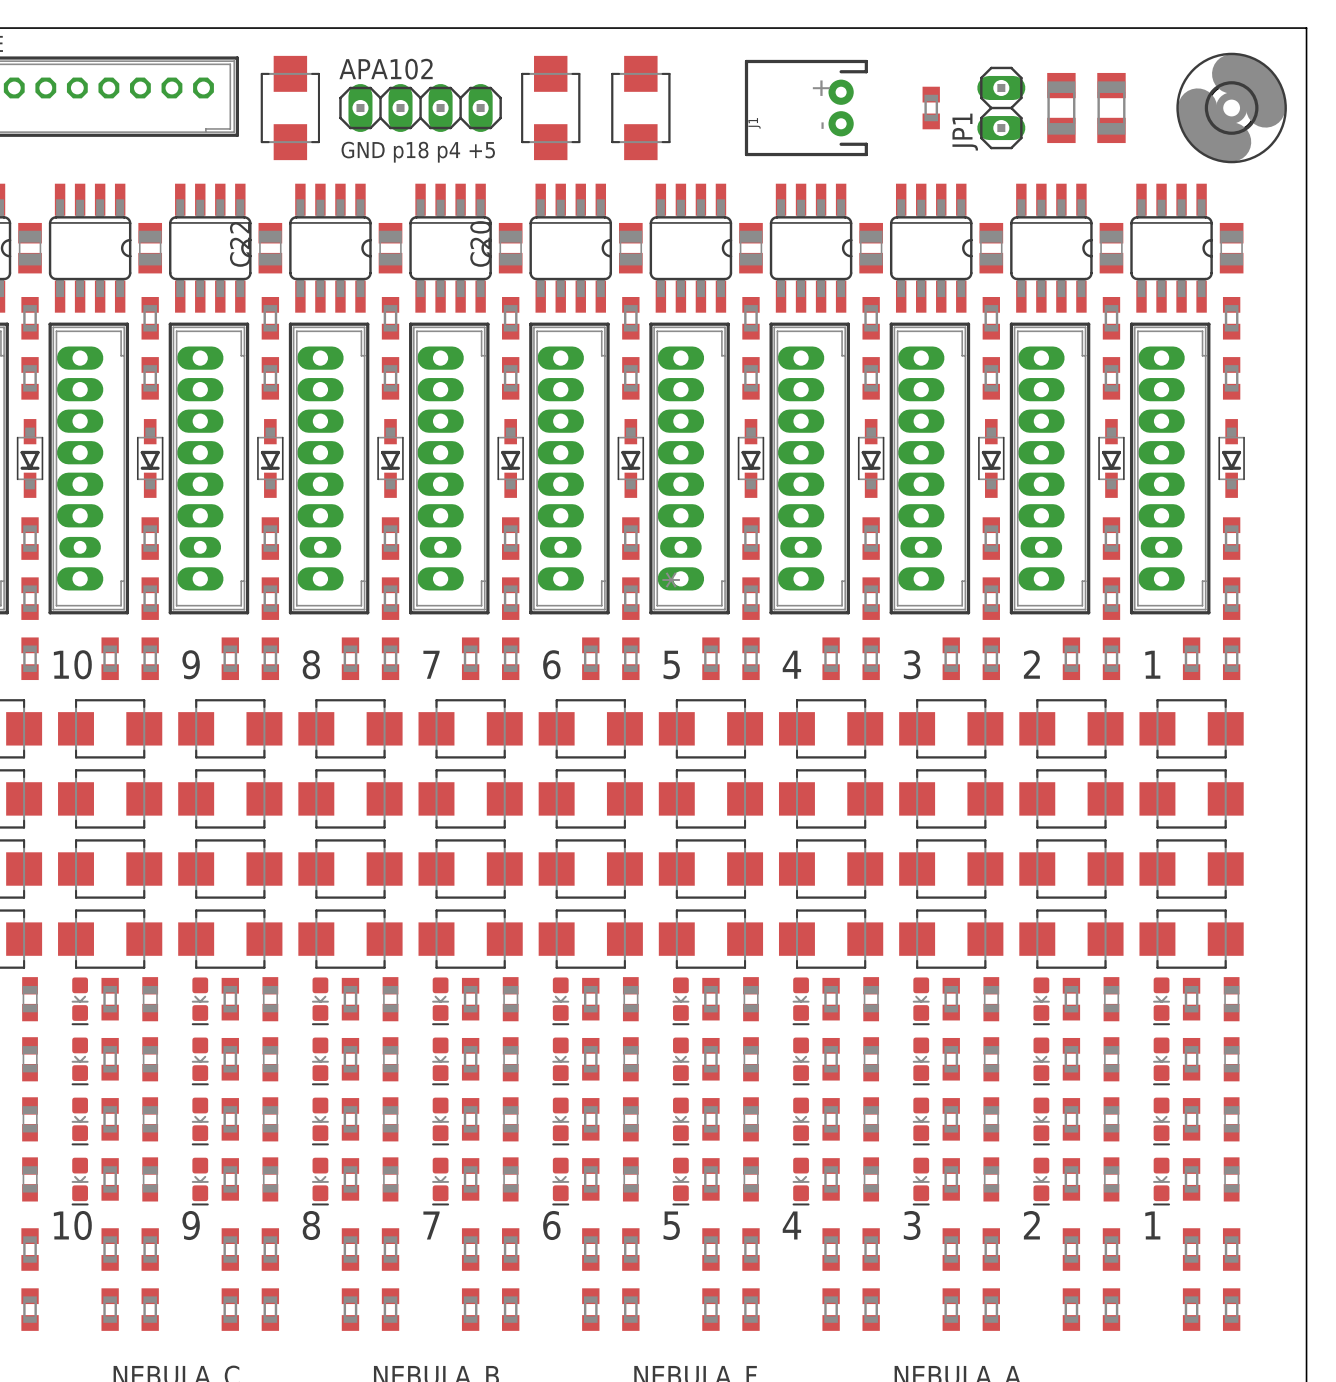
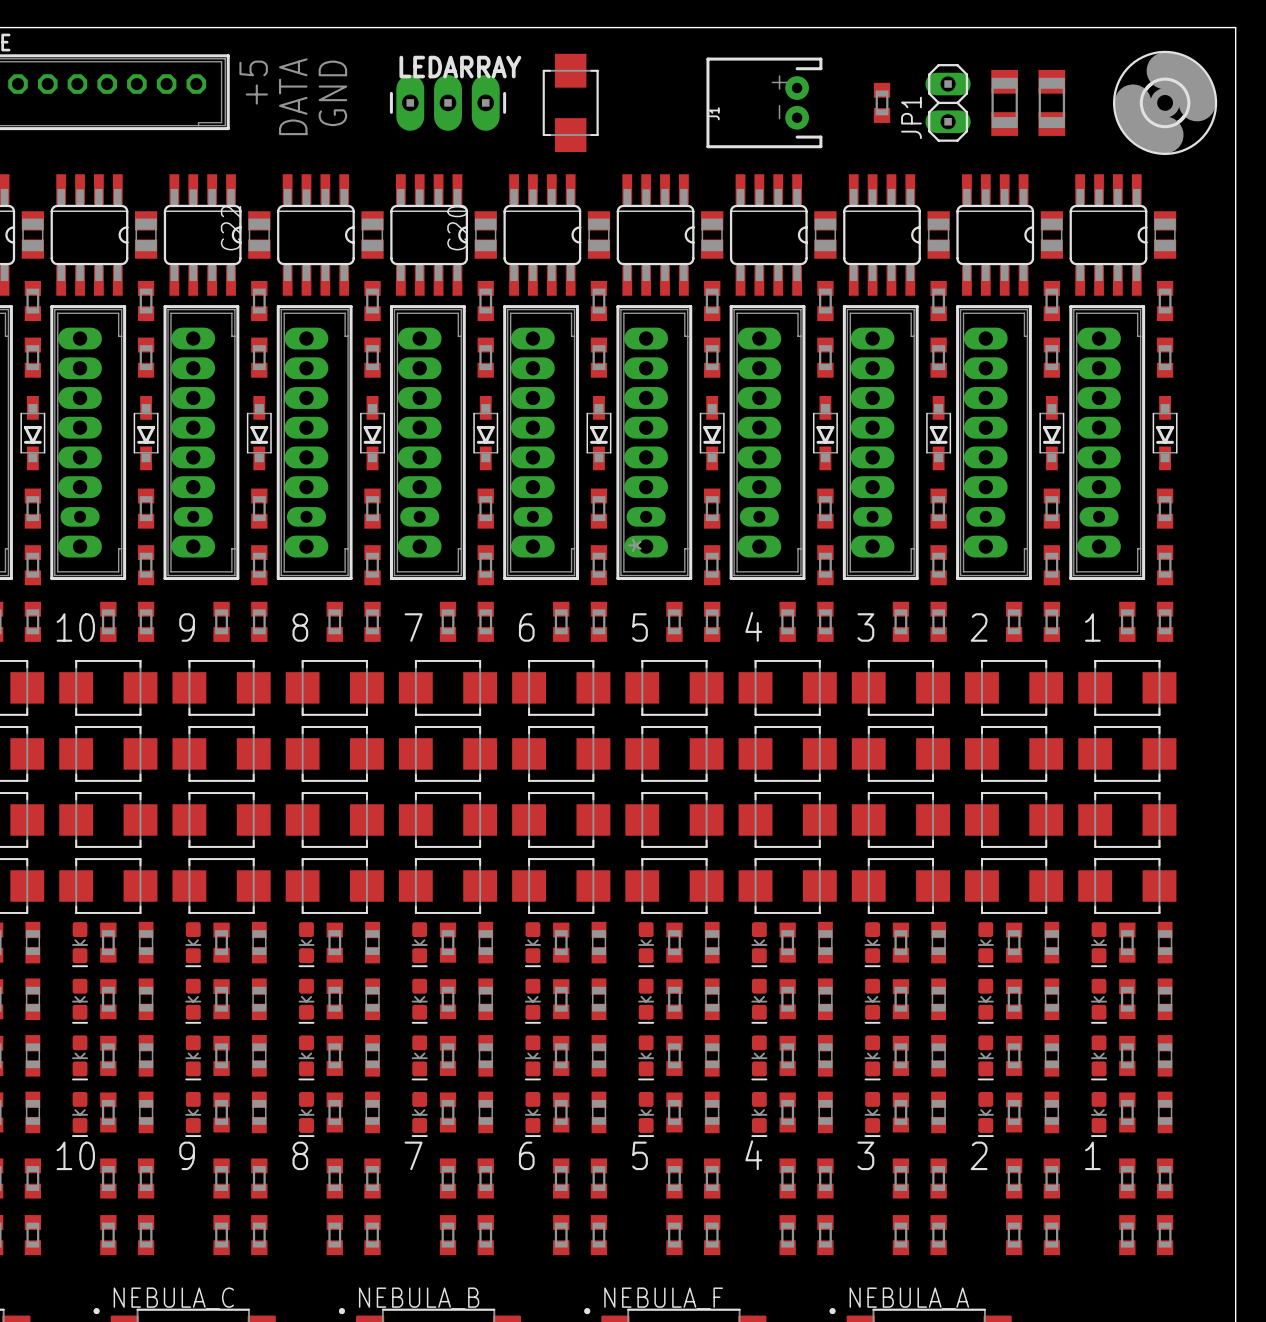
text: none -> +5 (253, 82)
text: none -> GND (332, 93)
text: none -> DATA (293, 96)
part: (290, 108) -> none
APA102: (420, 108) -> none
LEDARRAY: none -> (448, 102)
part: (550, 108) -> none
part: none -> (570, 102)
part: (640, 108) -> none
text: GND p18 p4 +5 (418, 152) -> none

